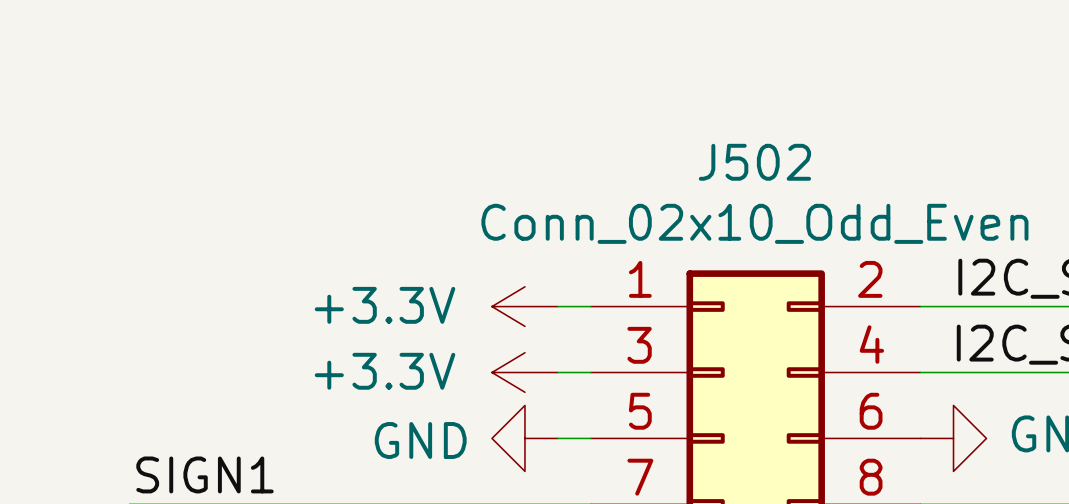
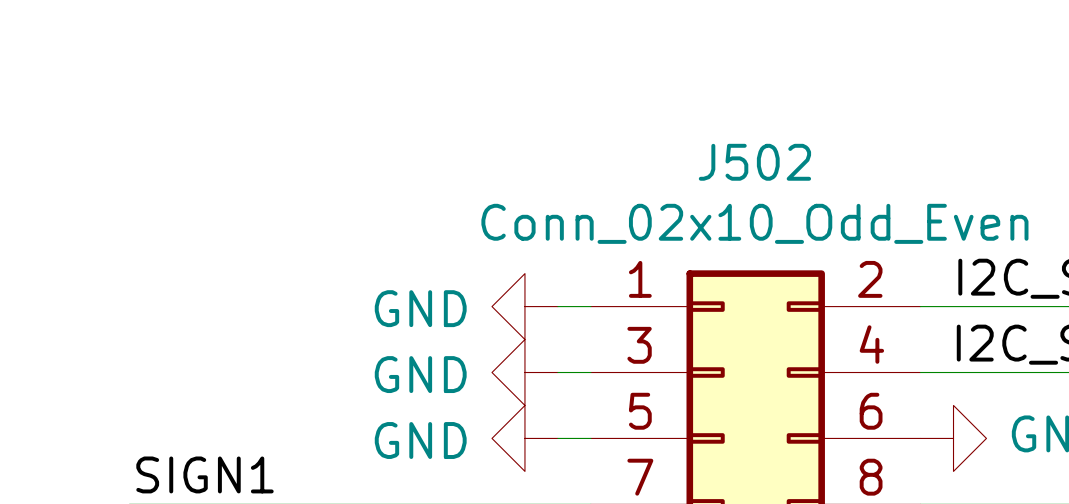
power symbol: +3.3V (524, 306) -> GND (524, 306)
power symbol: +3.3V (524, 372) -> GND (524, 372)

